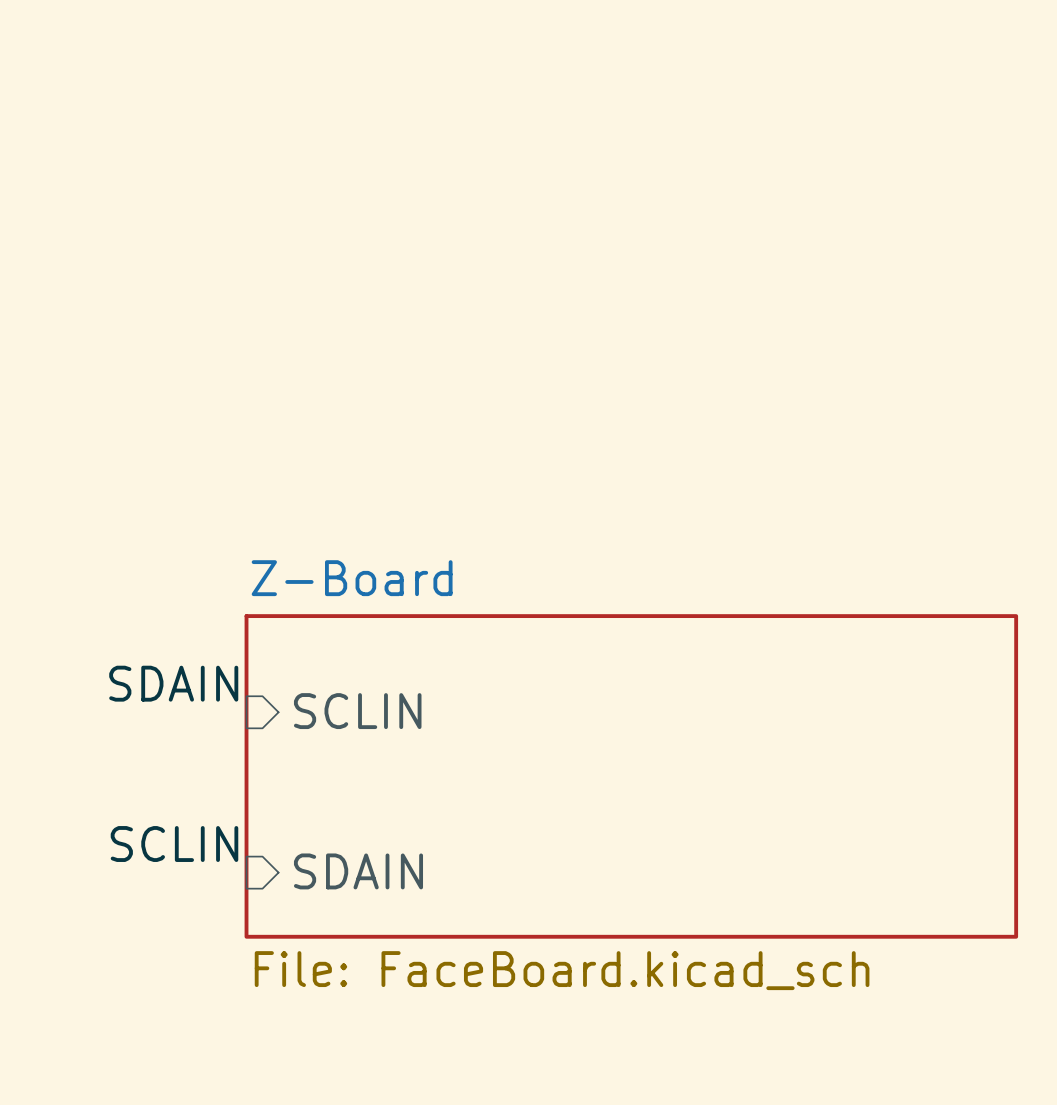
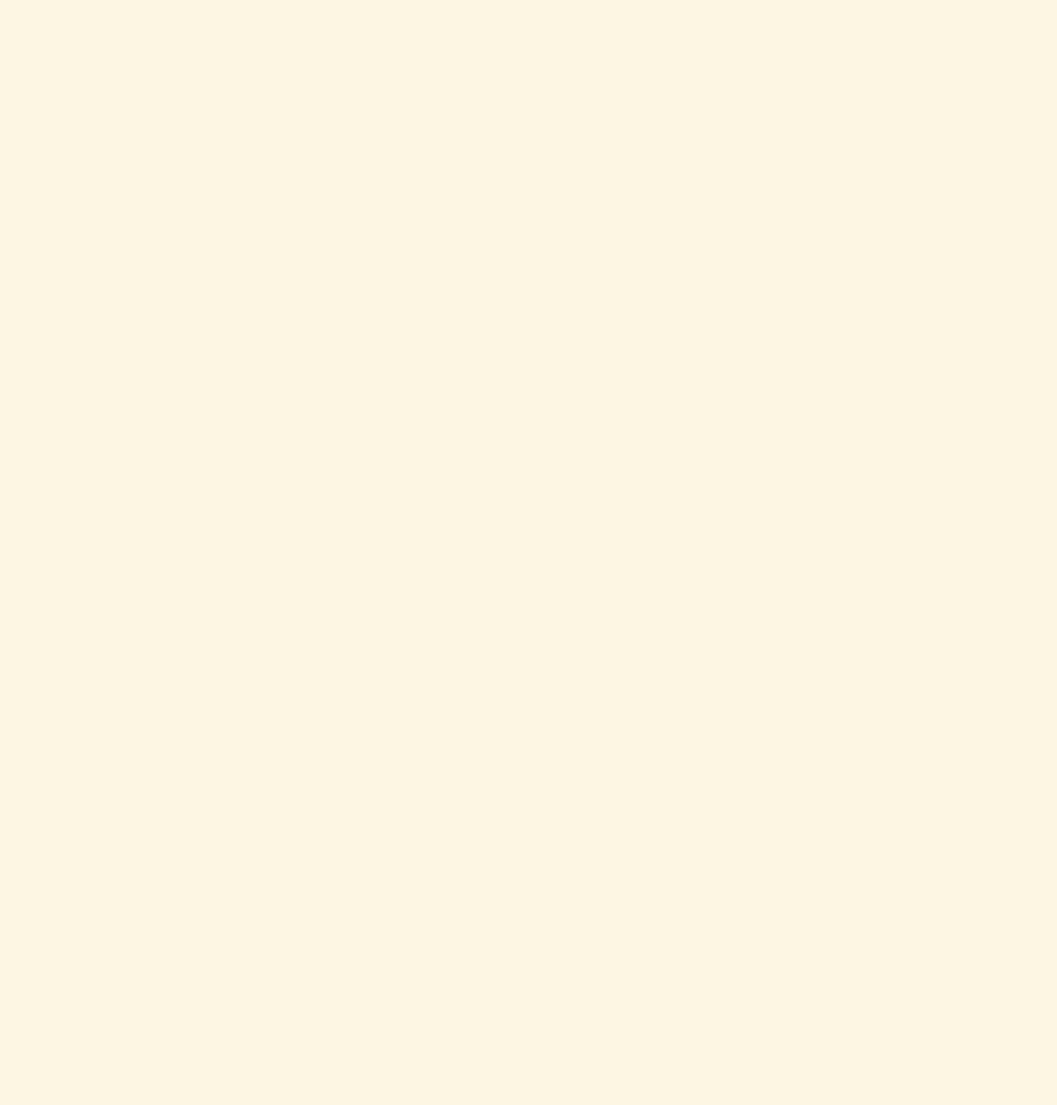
label: SDAIN (173, 683) -> none
sheet pin: SCLIN (357, 711) -> none
sheet Z-Board: File: FaceBoard.kicad_sch (631, 776) -> none
label: SCLIN (174, 844) -> none
sheet pin: SDAIN (358, 871) -> none

